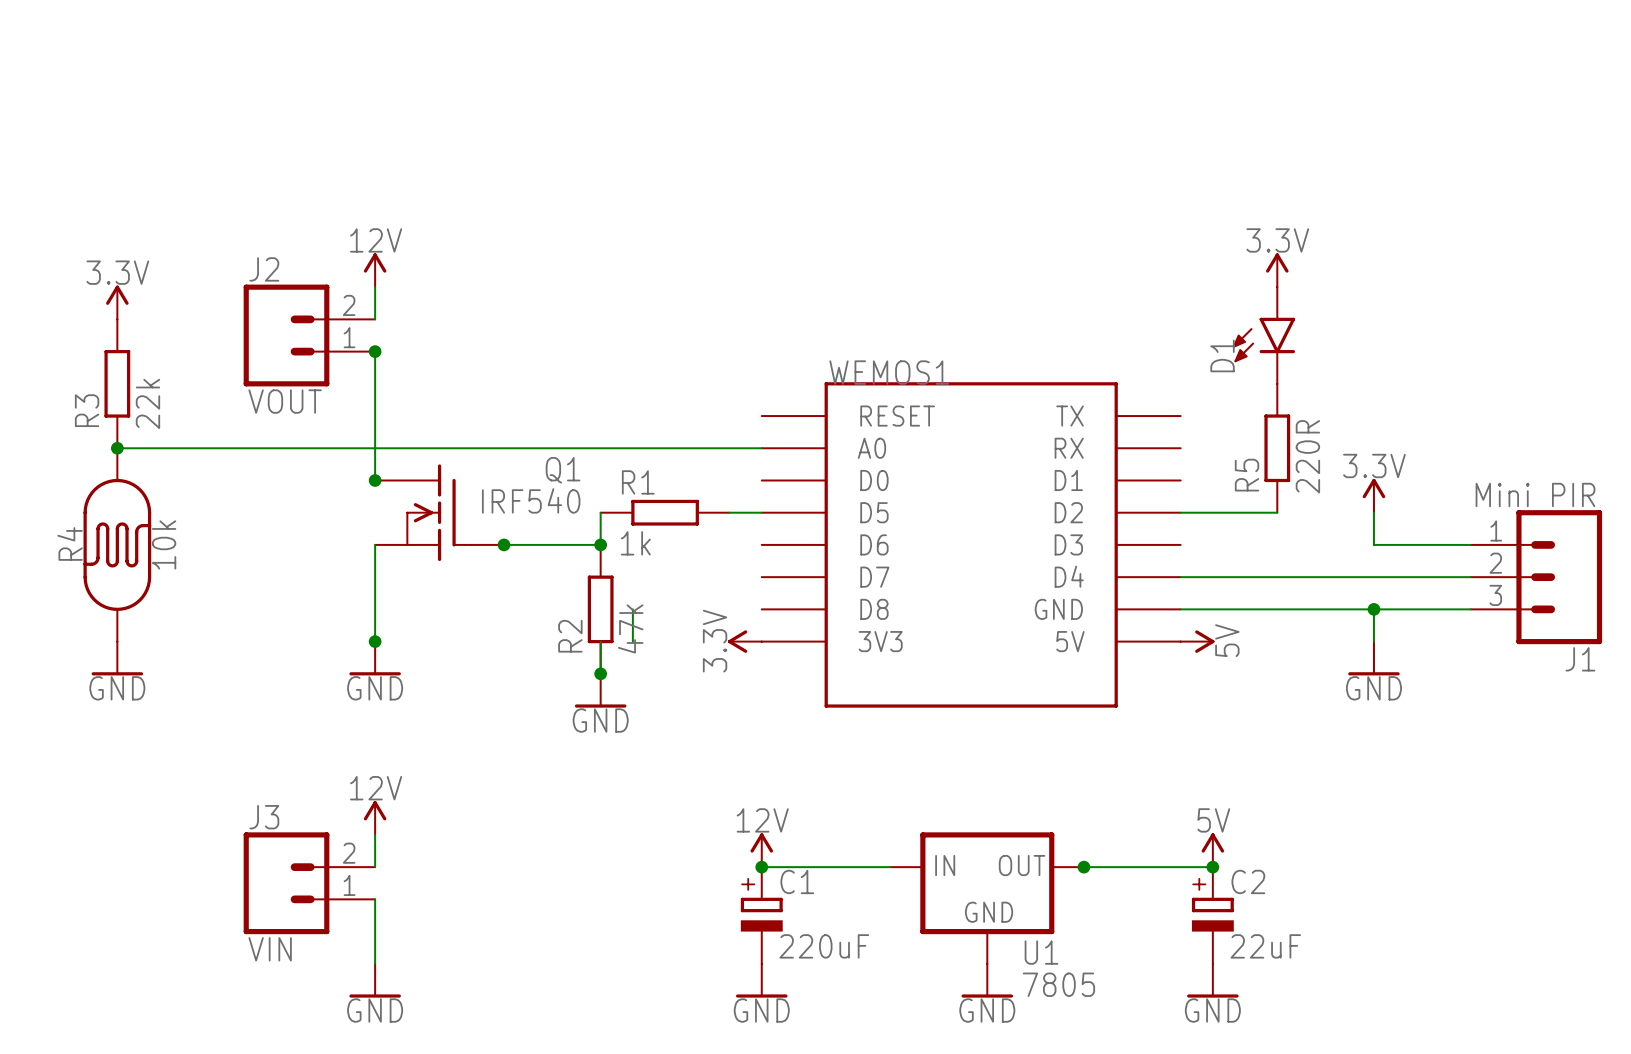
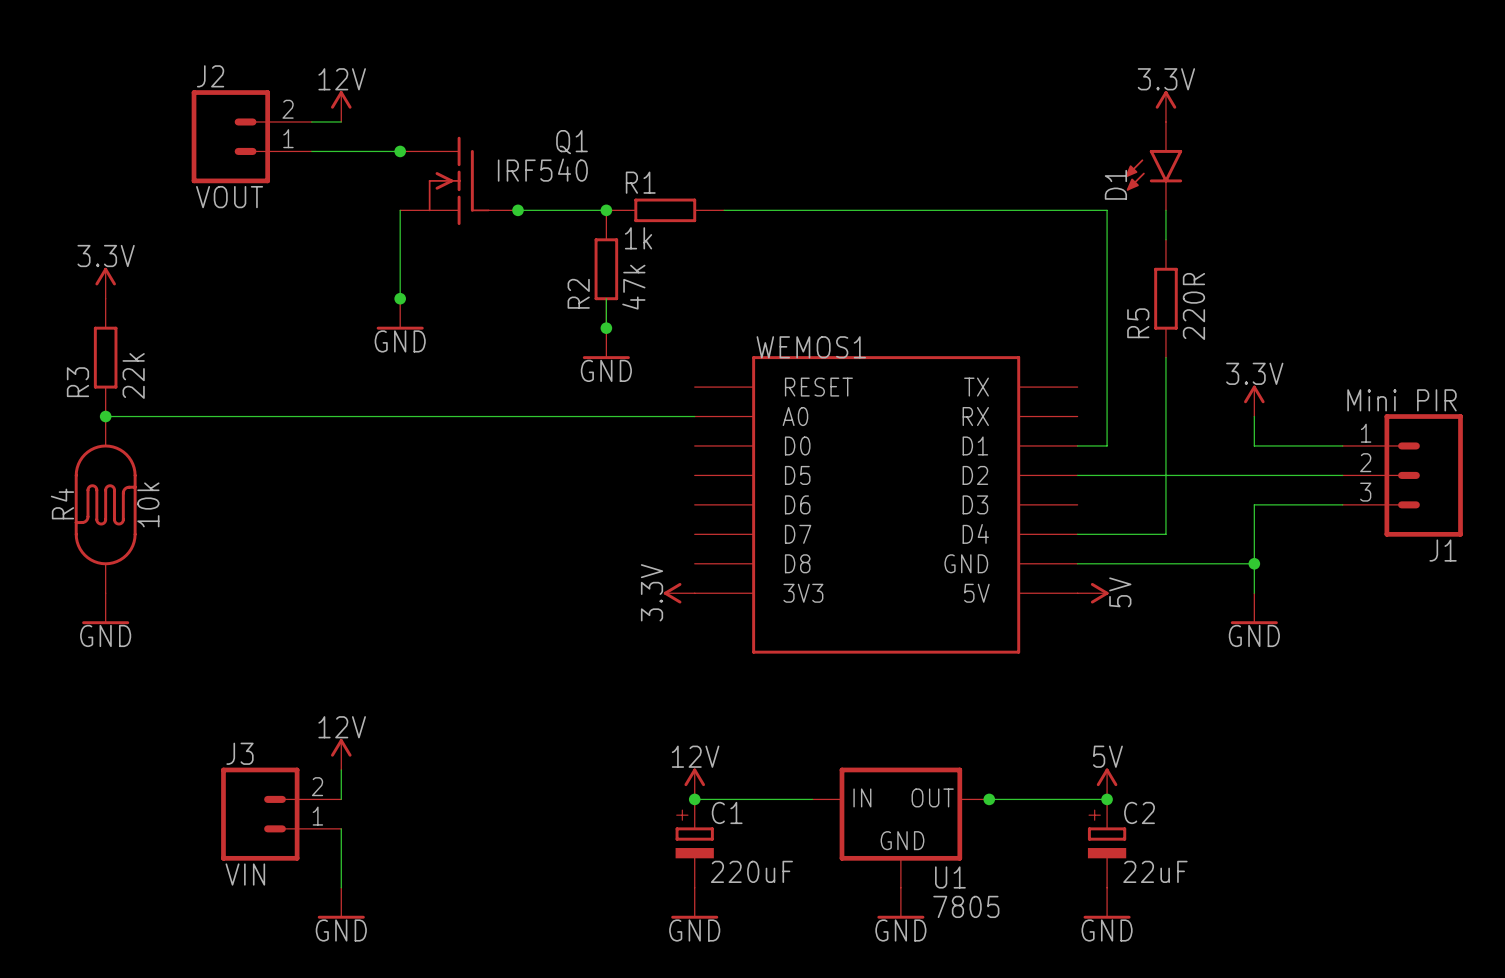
power symbol: none -> 3.3V (1165, 106)
wire: none -> (311, 121) (341, 121)
wire: none -> (311, 151) (400, 151)
junction: none -> (400, 151)
wire: none -> (400, 210) (400, 298)
wire: none -> (518, 210) (606, 210)
junction: none -> (518, 210)
junction: none -> (606, 210)
wire: none -> (724, 210) (1107, 210) (1107, 445) (1077, 445)
wire: none -> (1165, 210) (1165, 239)
power symbol position: 12V (375, 270) -> 12V (341, 106)
power symbol: 3.3V (1277, 270) -> none
wire: (375, 287) (375, 319) -> none
J2 position: (309, 335) -> (251, 136)
D1 position: (1263, 335) -> (1153, 166)
power symbol: none -> GND (400, 314)
wire: (375, 351) (375, 480) -> none
junction position: (375, 351) -> (400, 298)
junction: none -> (606, 328)
power symbol: none -> GND (606, 343)
R5 position: (1277, 448) -> (1165, 298)
wire: none -> (1254, 416) (1254, 445) (1342, 445)
junction: (375, 480) -> none
power symbol position: 3.3V (1373, 495) -> 3.3V (1254, 401)
Q1 position: (439, 512) -> (459, 180)
wire: (600, 512) (600, 544) (504, 544) -> none
R1 position: (665, 512) -> (665, 210)
wire: (729, 512) (761, 512) -> none
wire: none -> (1165, 475) (1342, 475)
wire: (1373, 512) (1373, 544) -> (1254, 563) (1254, 504)
wire: (375, 544) (375, 641) -> none
junction: (504, 544) -> none
junction: (600, 544) -> none
wire: (1277, 577) (1470, 577) -> (1165, 534) (1165, 357)
J1 position: (1536, 577) -> (1402, 475)
R2 position: (600, 609) -> (606, 269)
wire: (632, 609) (632, 641) -> (606, 298) (606, 328)
wire: (1373, 609) (1470, 609) -> none
junction: (375, 641) -> none
wire: (600, 641) (600, 673) -> none
power symbol: GND (375, 658) -> none
junction: (600, 673) -> none
power symbol: GND (600, 690) -> none

